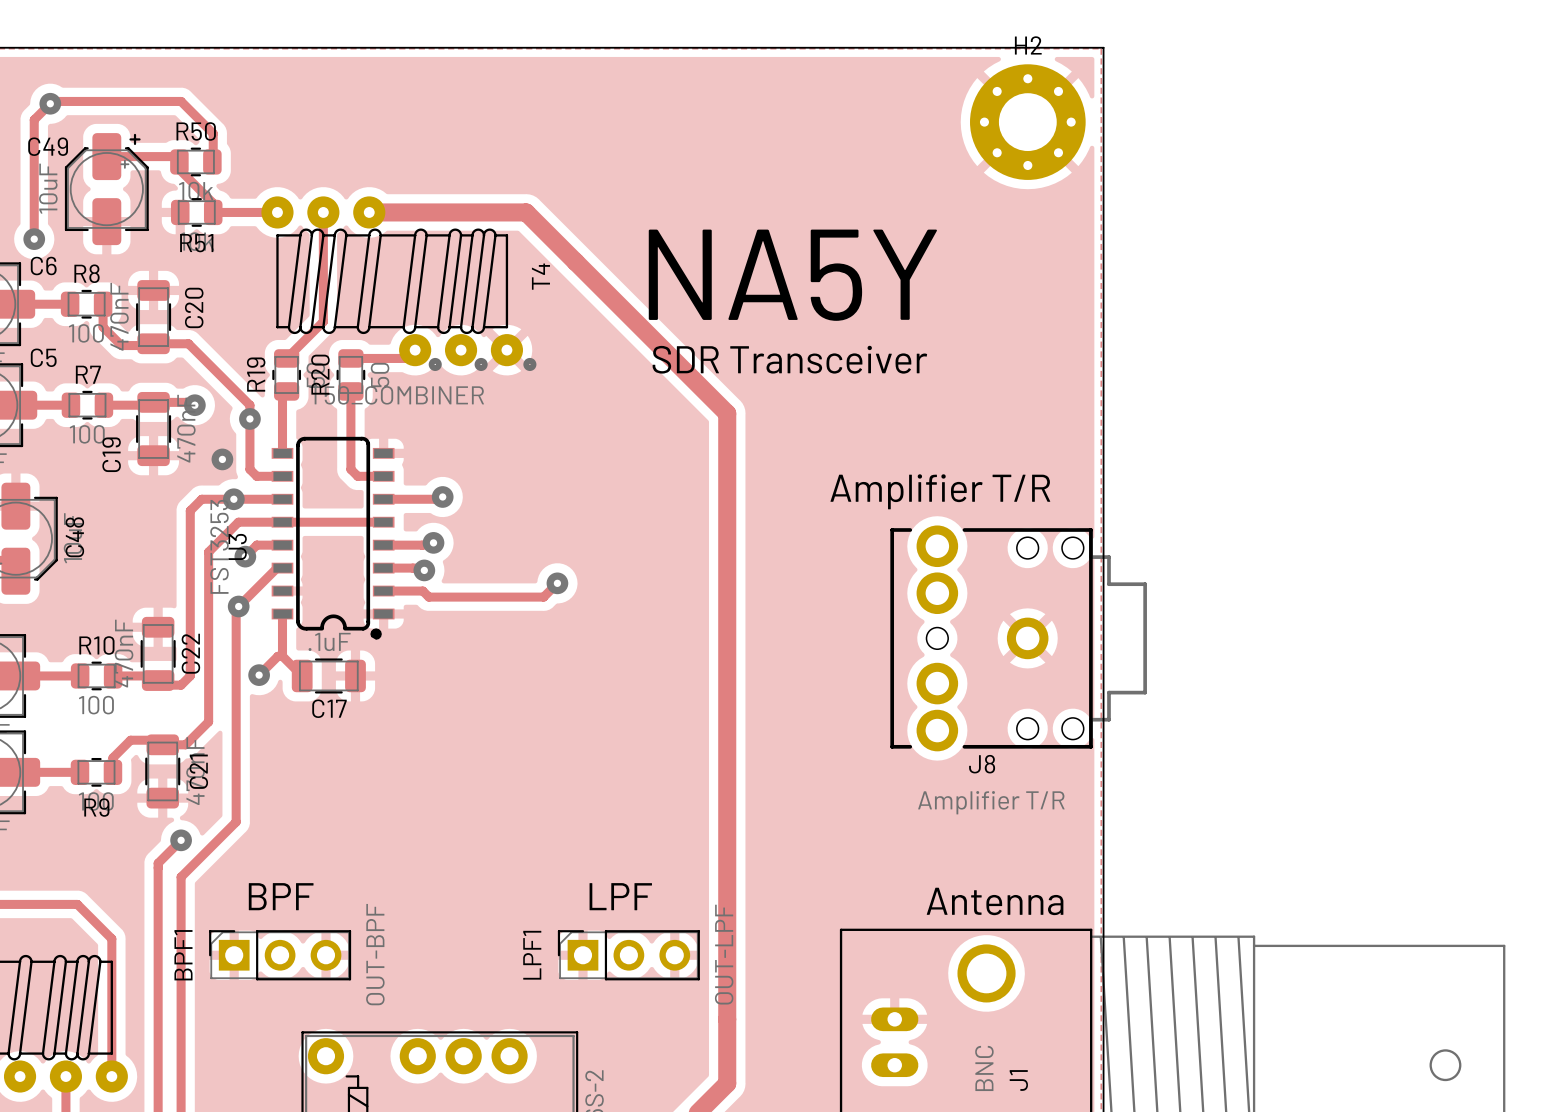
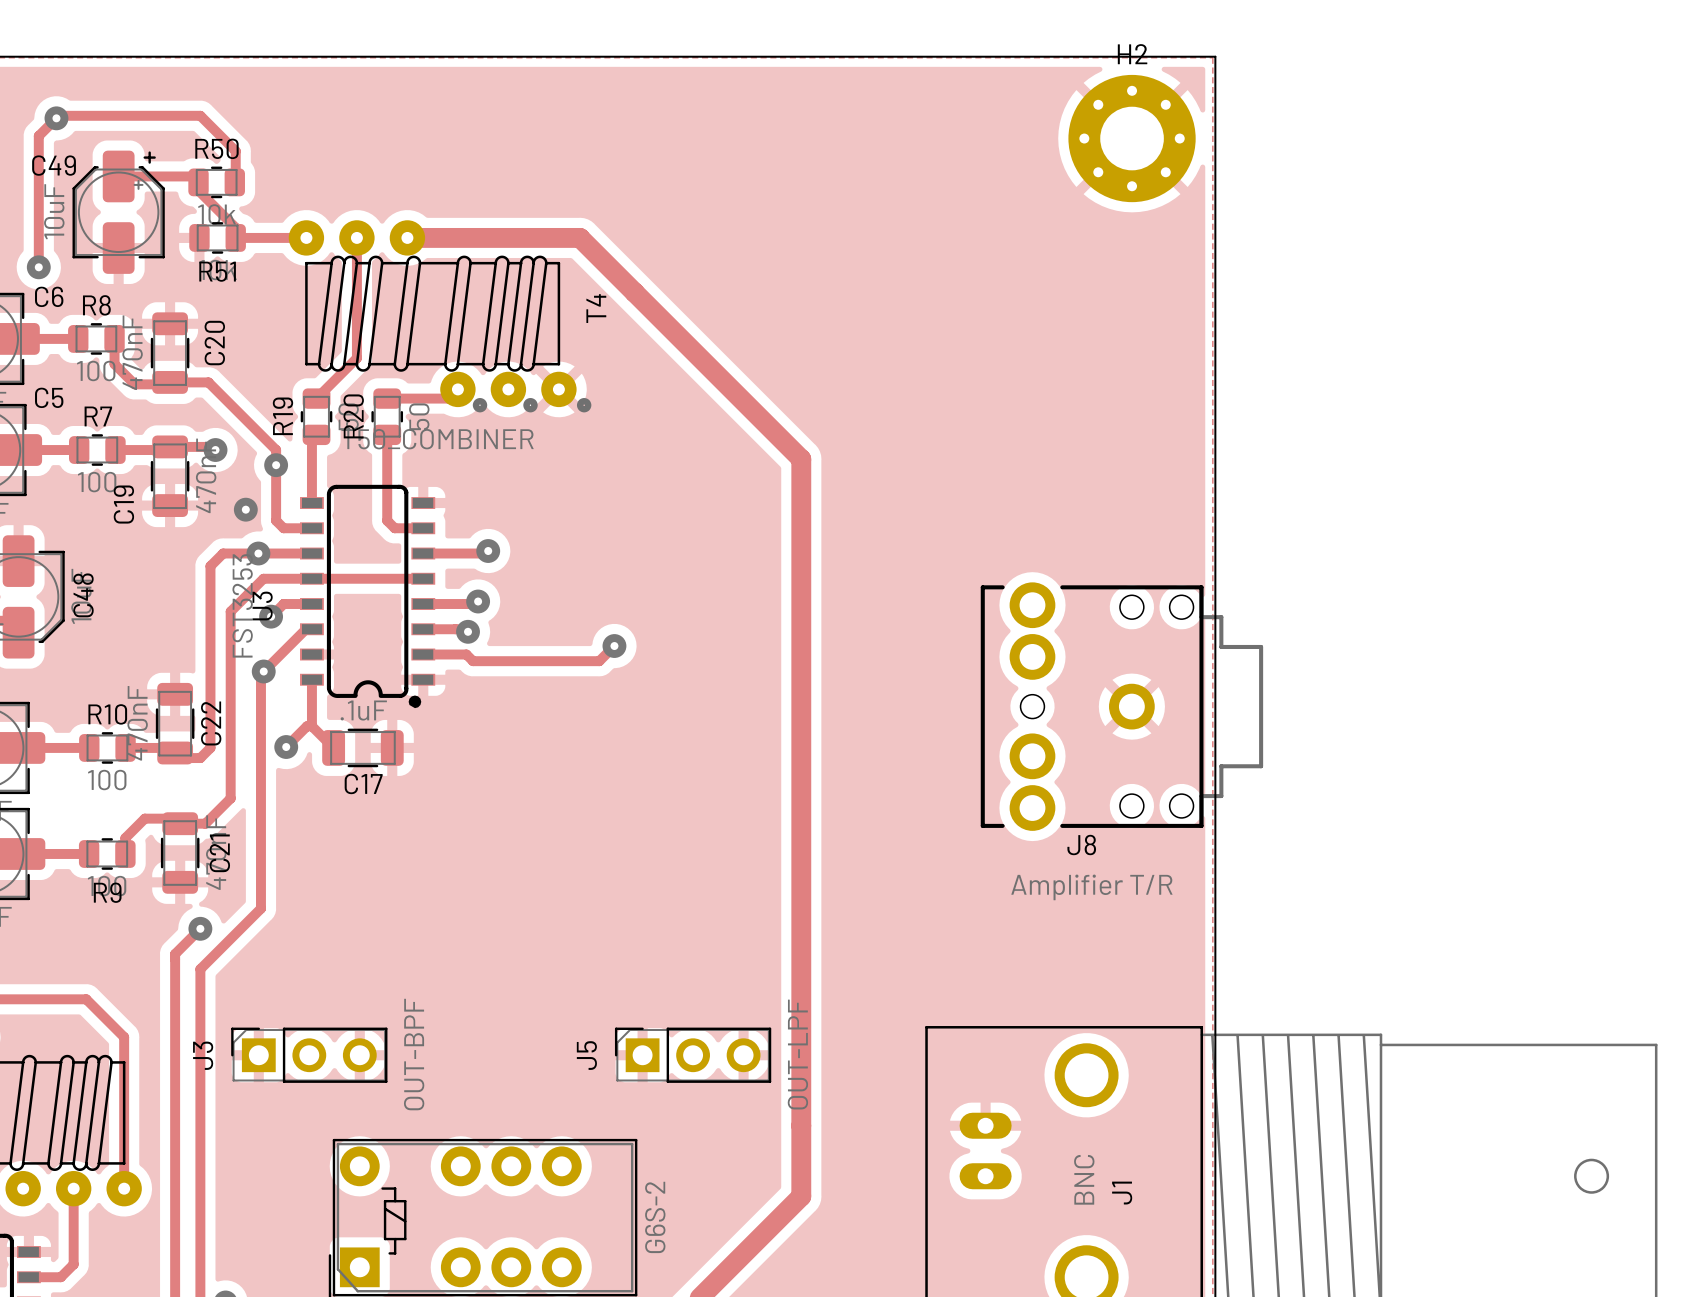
text: NA5Y (792, 275) -> none
text: SDR Transceiver (789, 359) -> none
text: Amplifier T/R (940, 491) -> none
text: BPF (281, 896) -> none
text: LPF (620, 896) -> none
text: Antenna (995, 901) -> none
BPF1 name: BPF1 (183, 955) -> J3 (203, 1055)
LPF1 name: LPF1 (532, 955) -> J5 (586, 1055)

